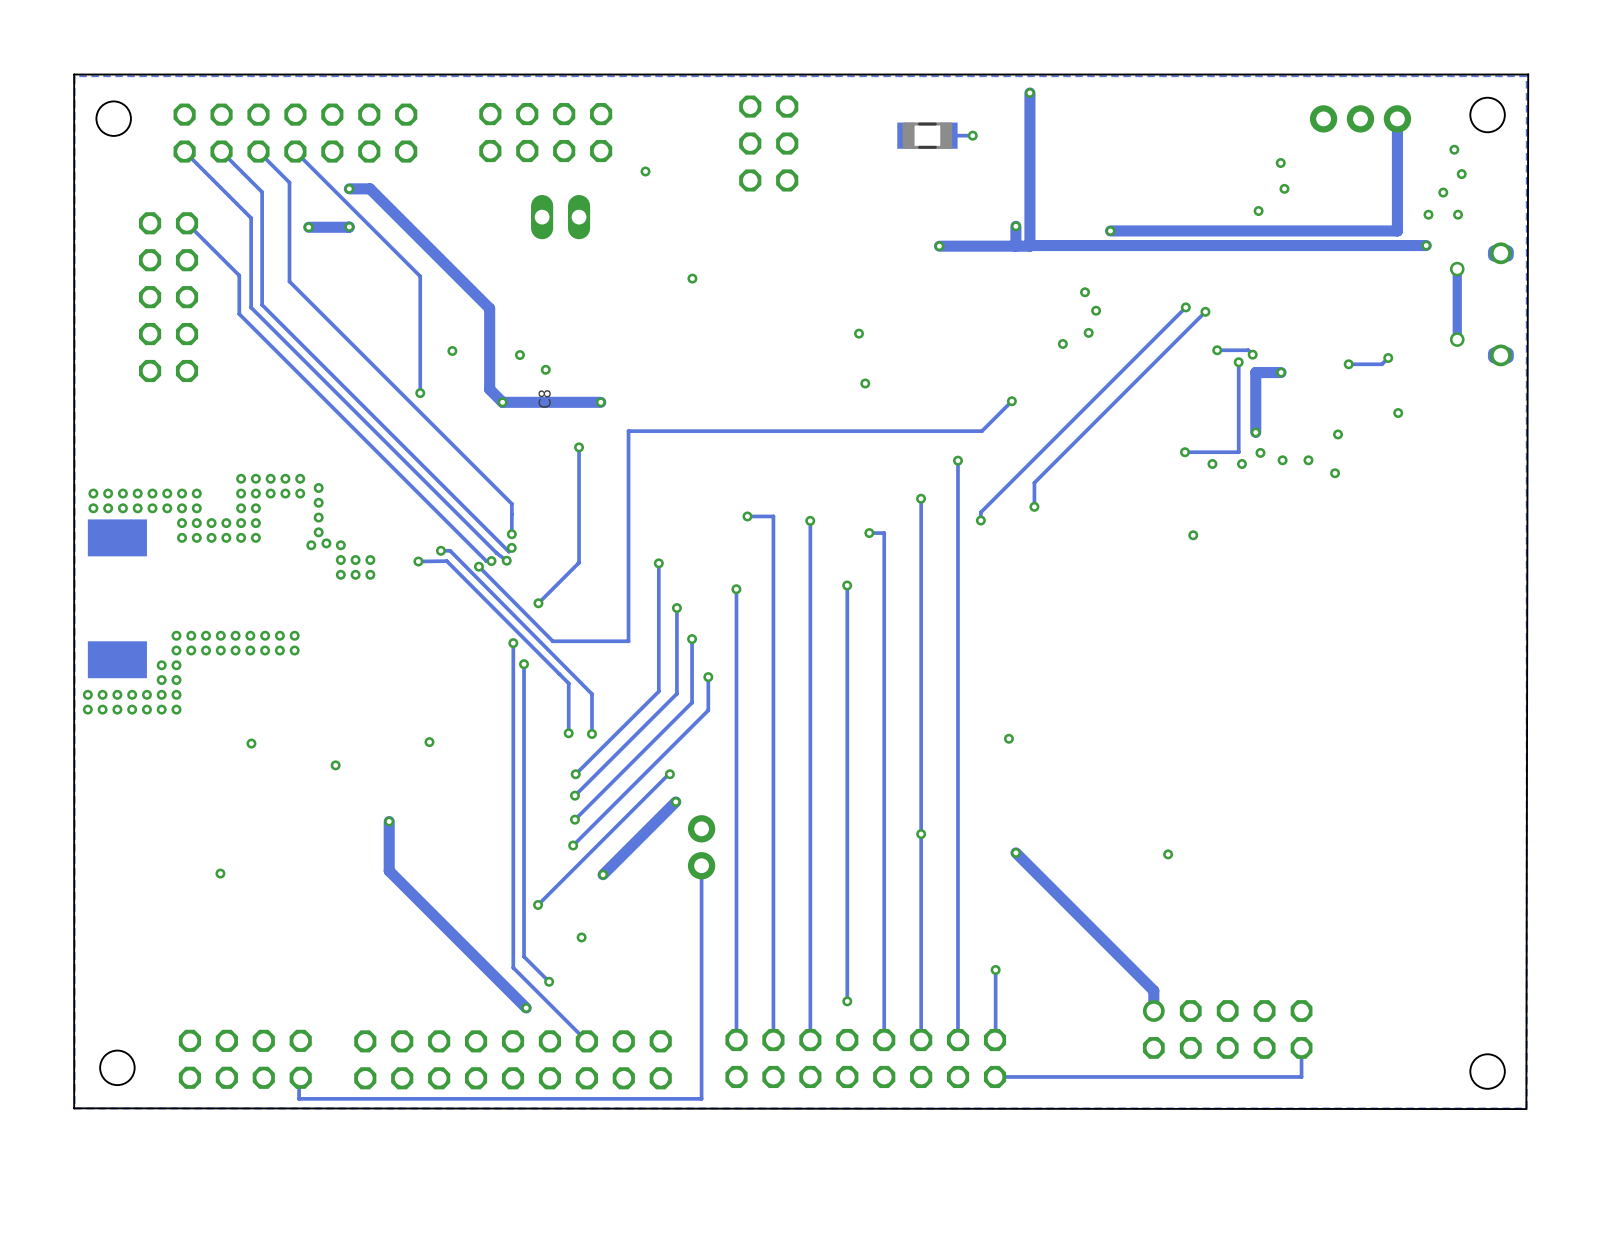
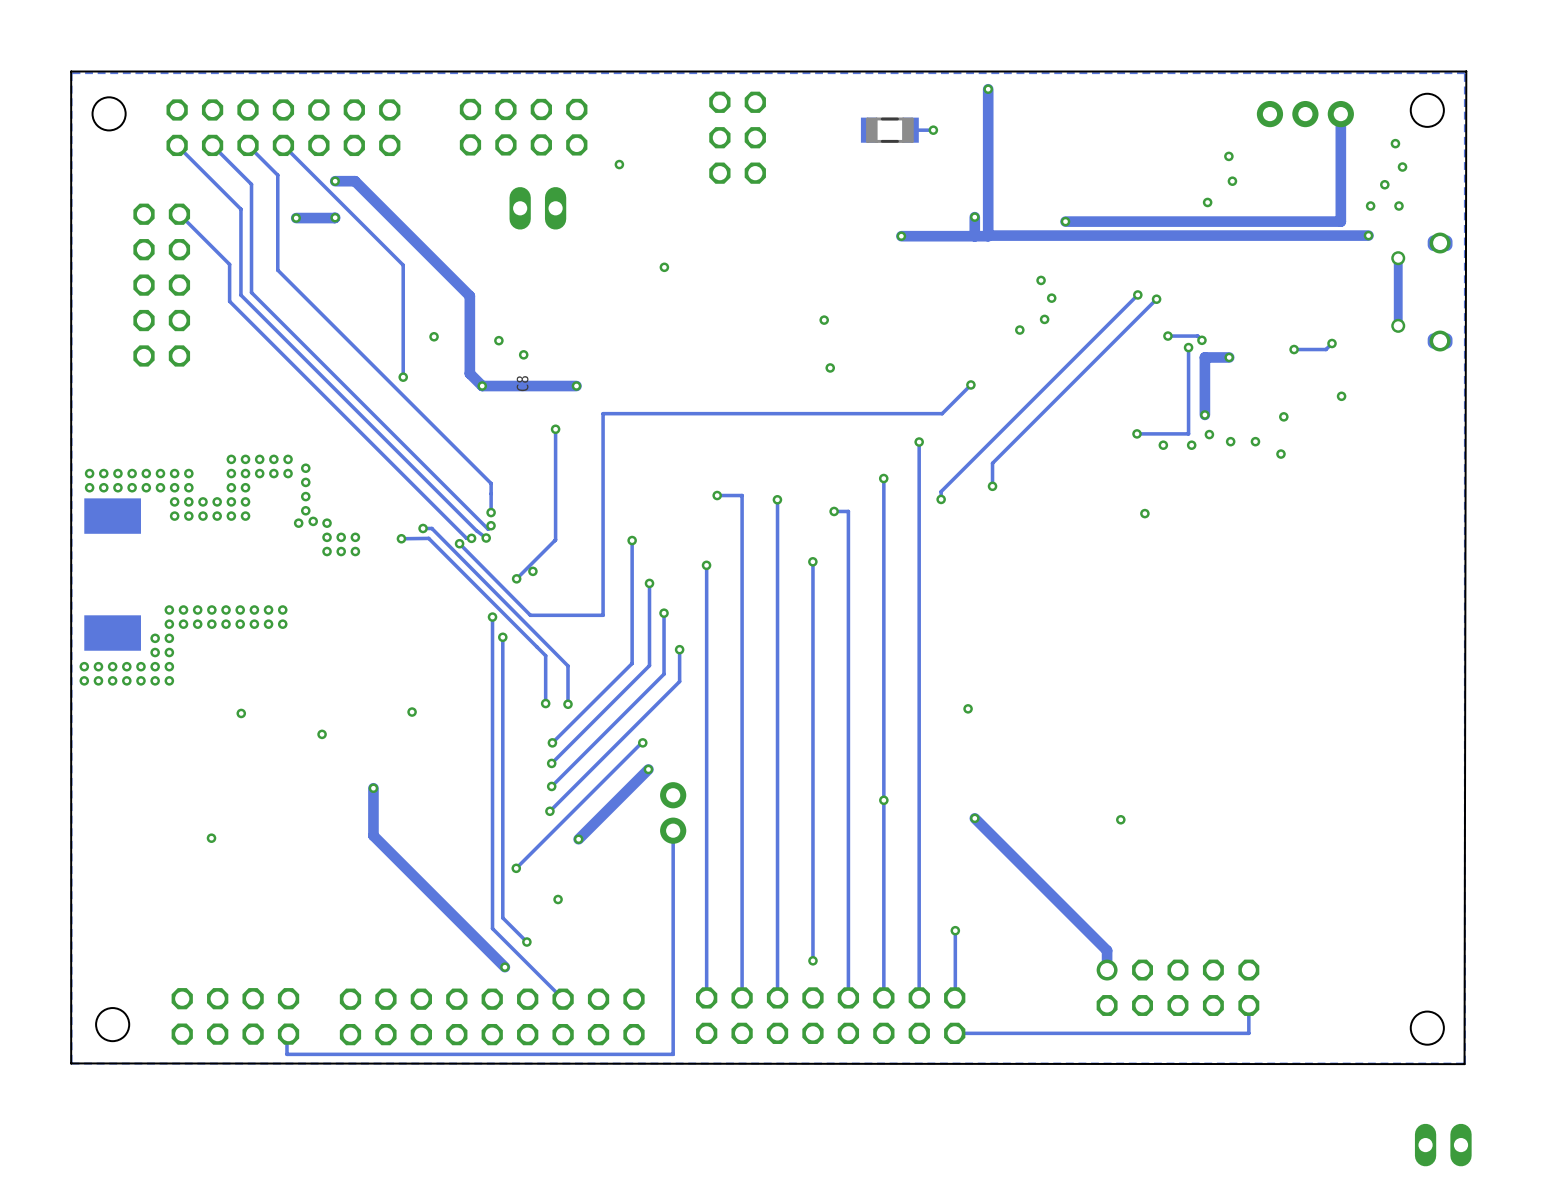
via: none -> (532, 571)
part: none -> (1443, 1145)

